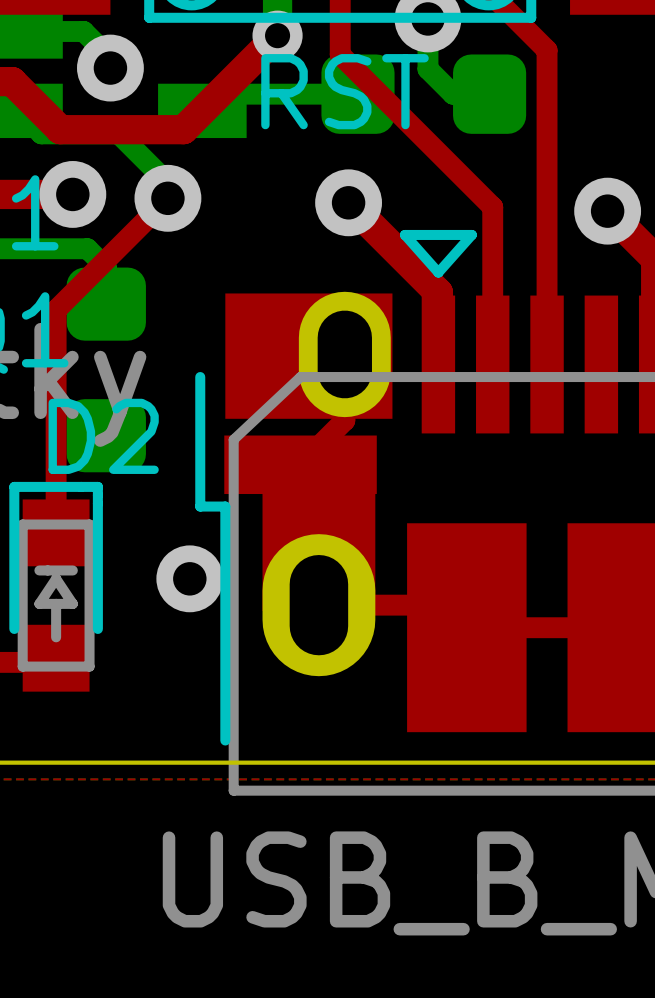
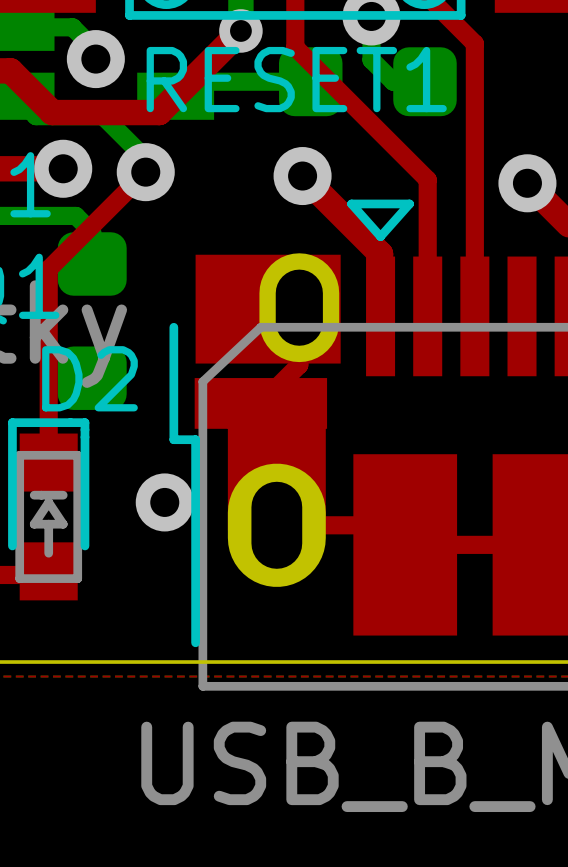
RST name: RST (345, 91) -> RESET1 (296, 79)

